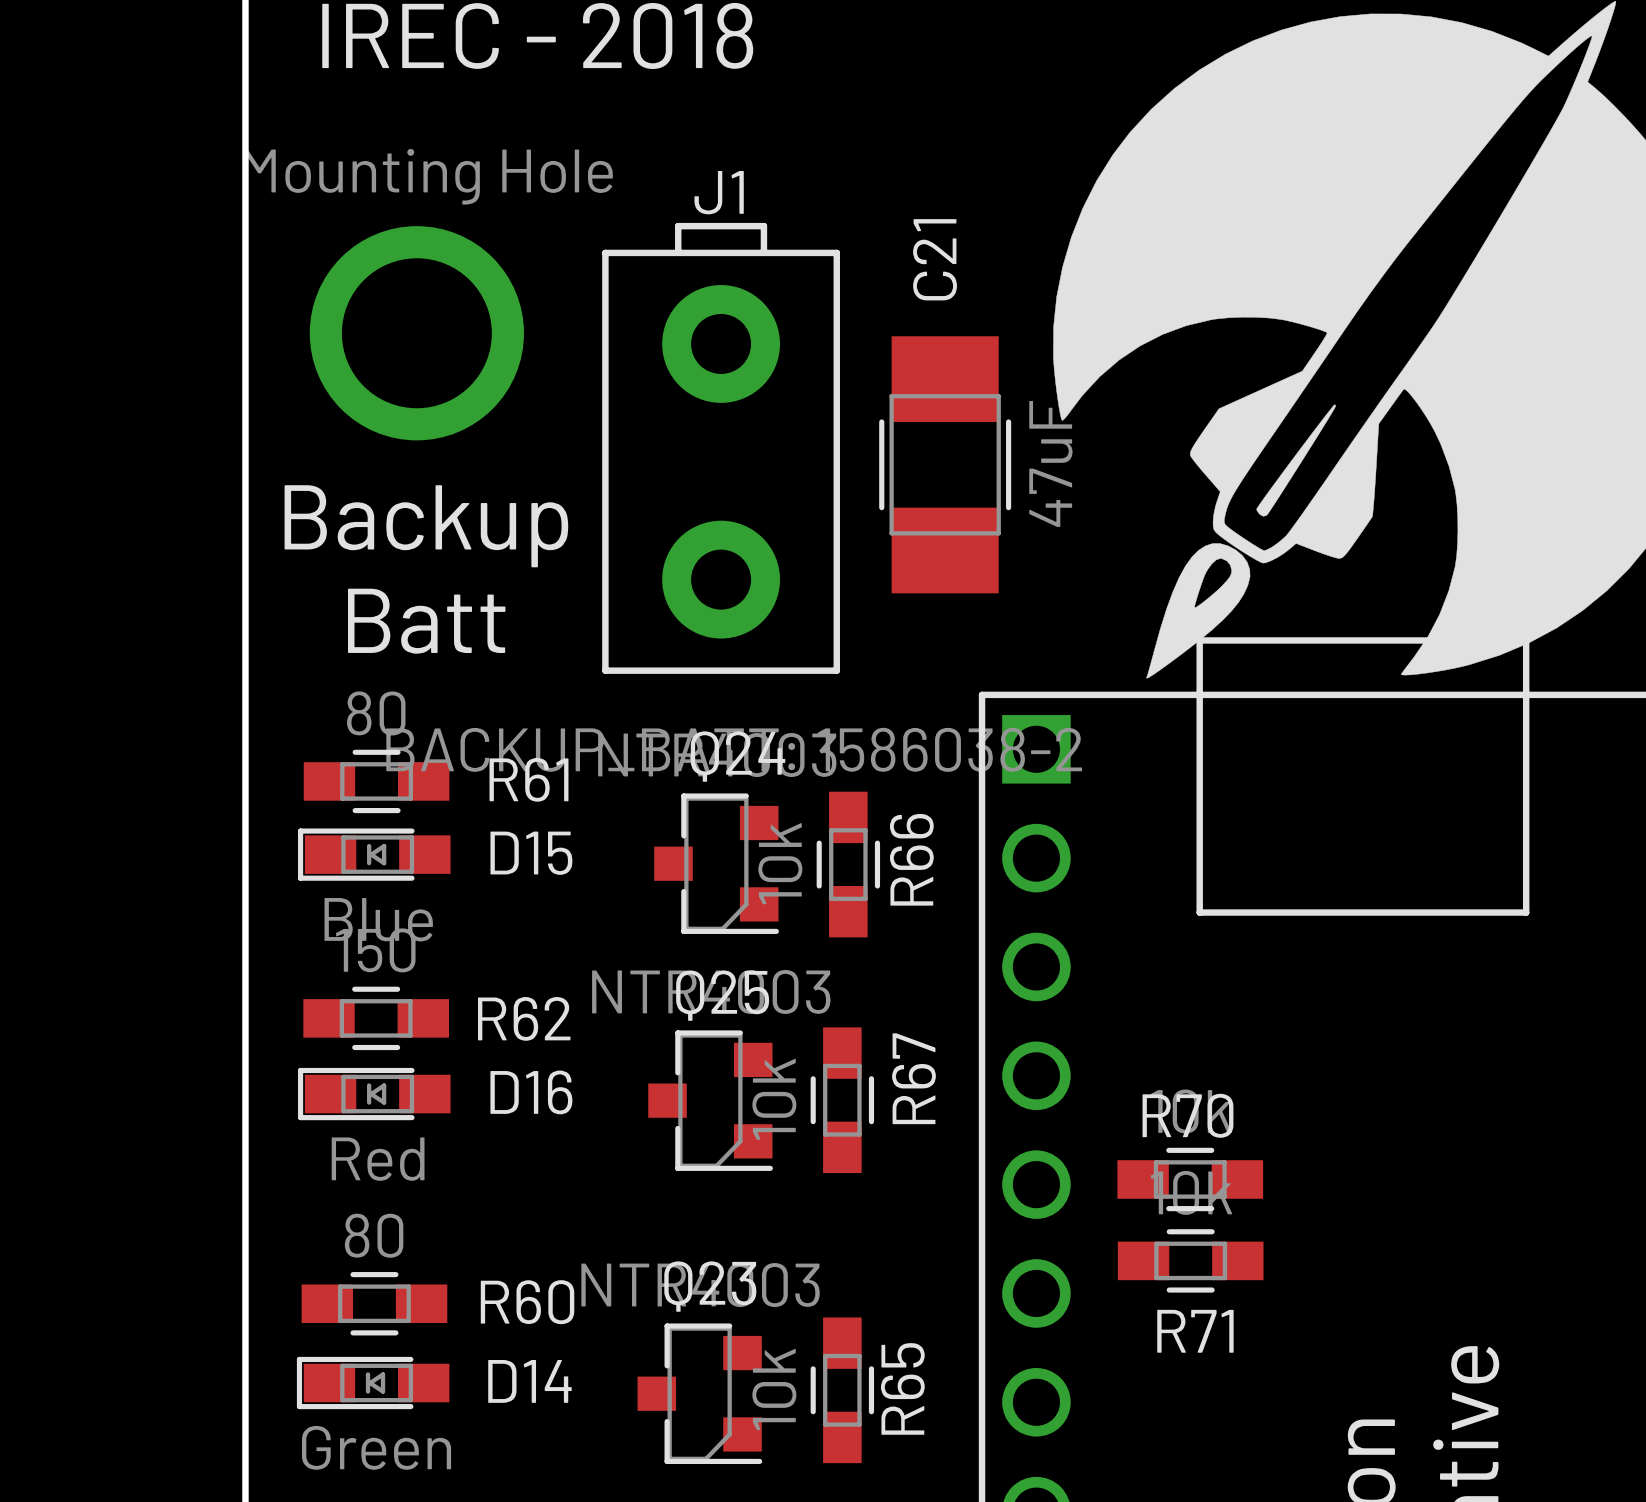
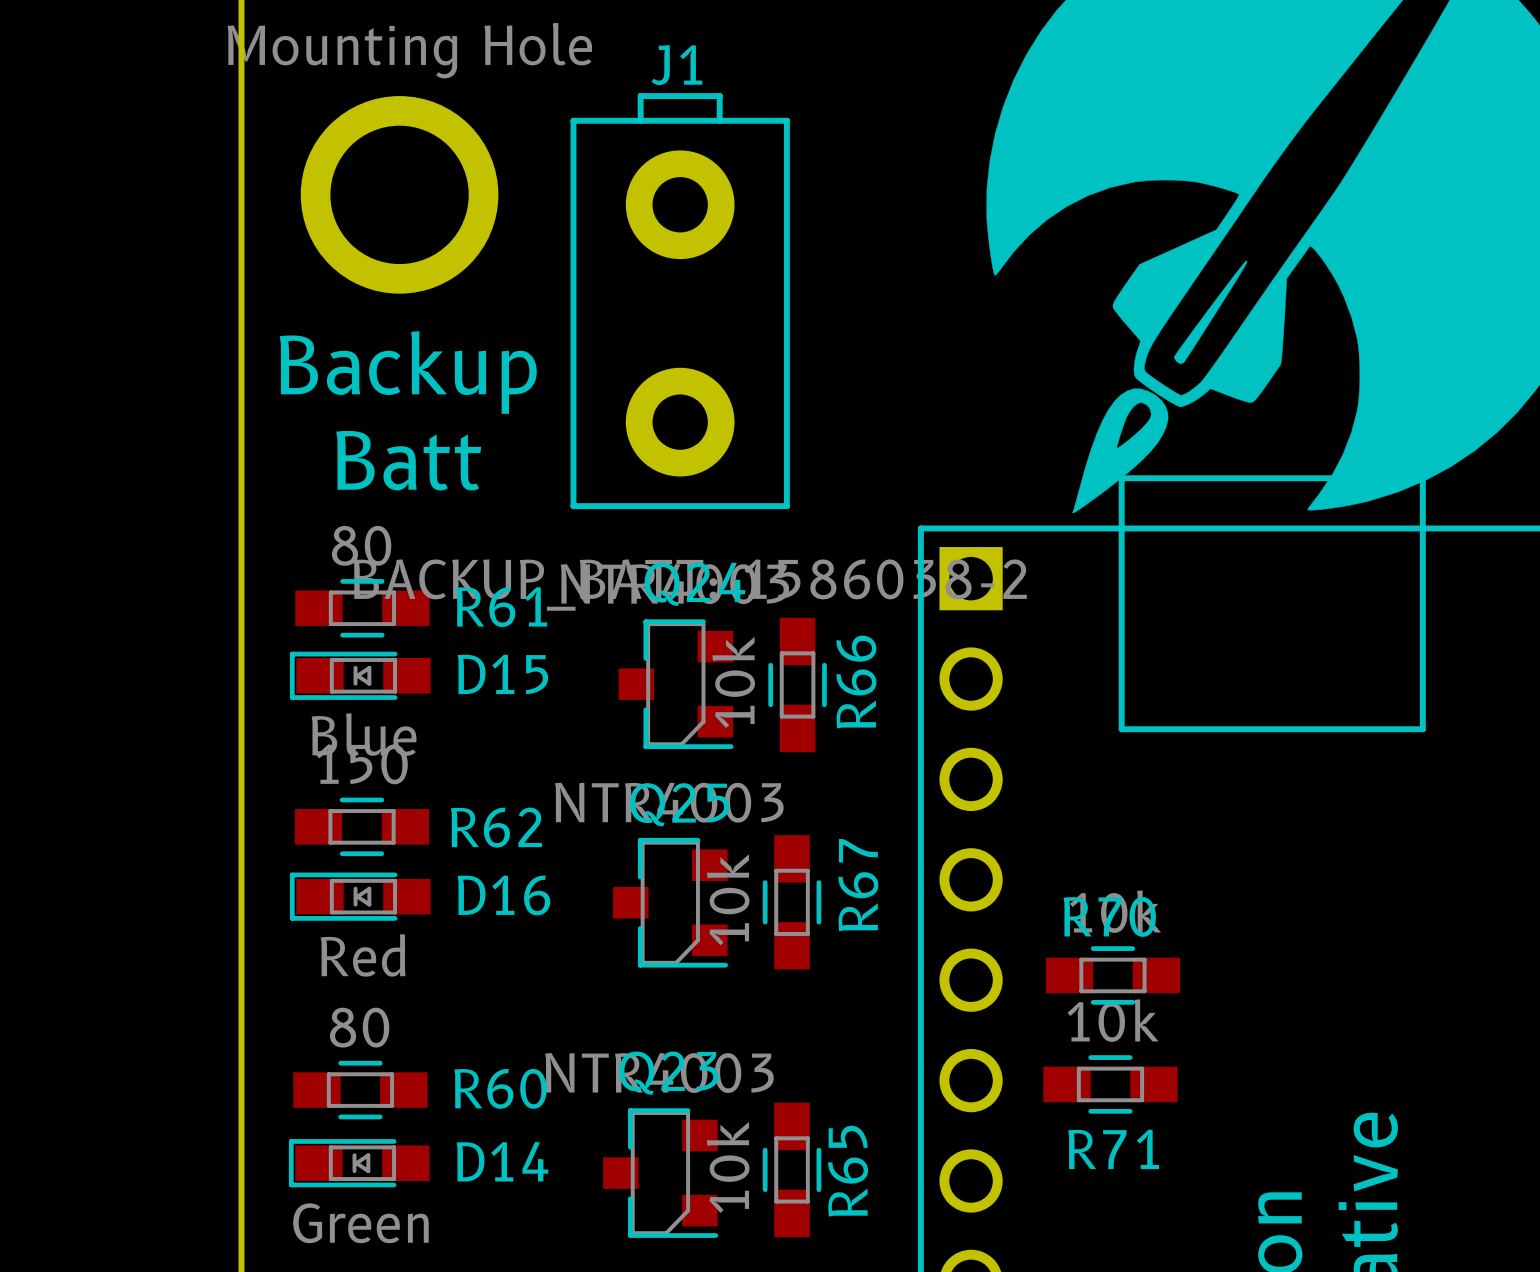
C21: 47uF (945, 464) -> none
R71 position: (1190, 1260) -> (1110, 1084)

